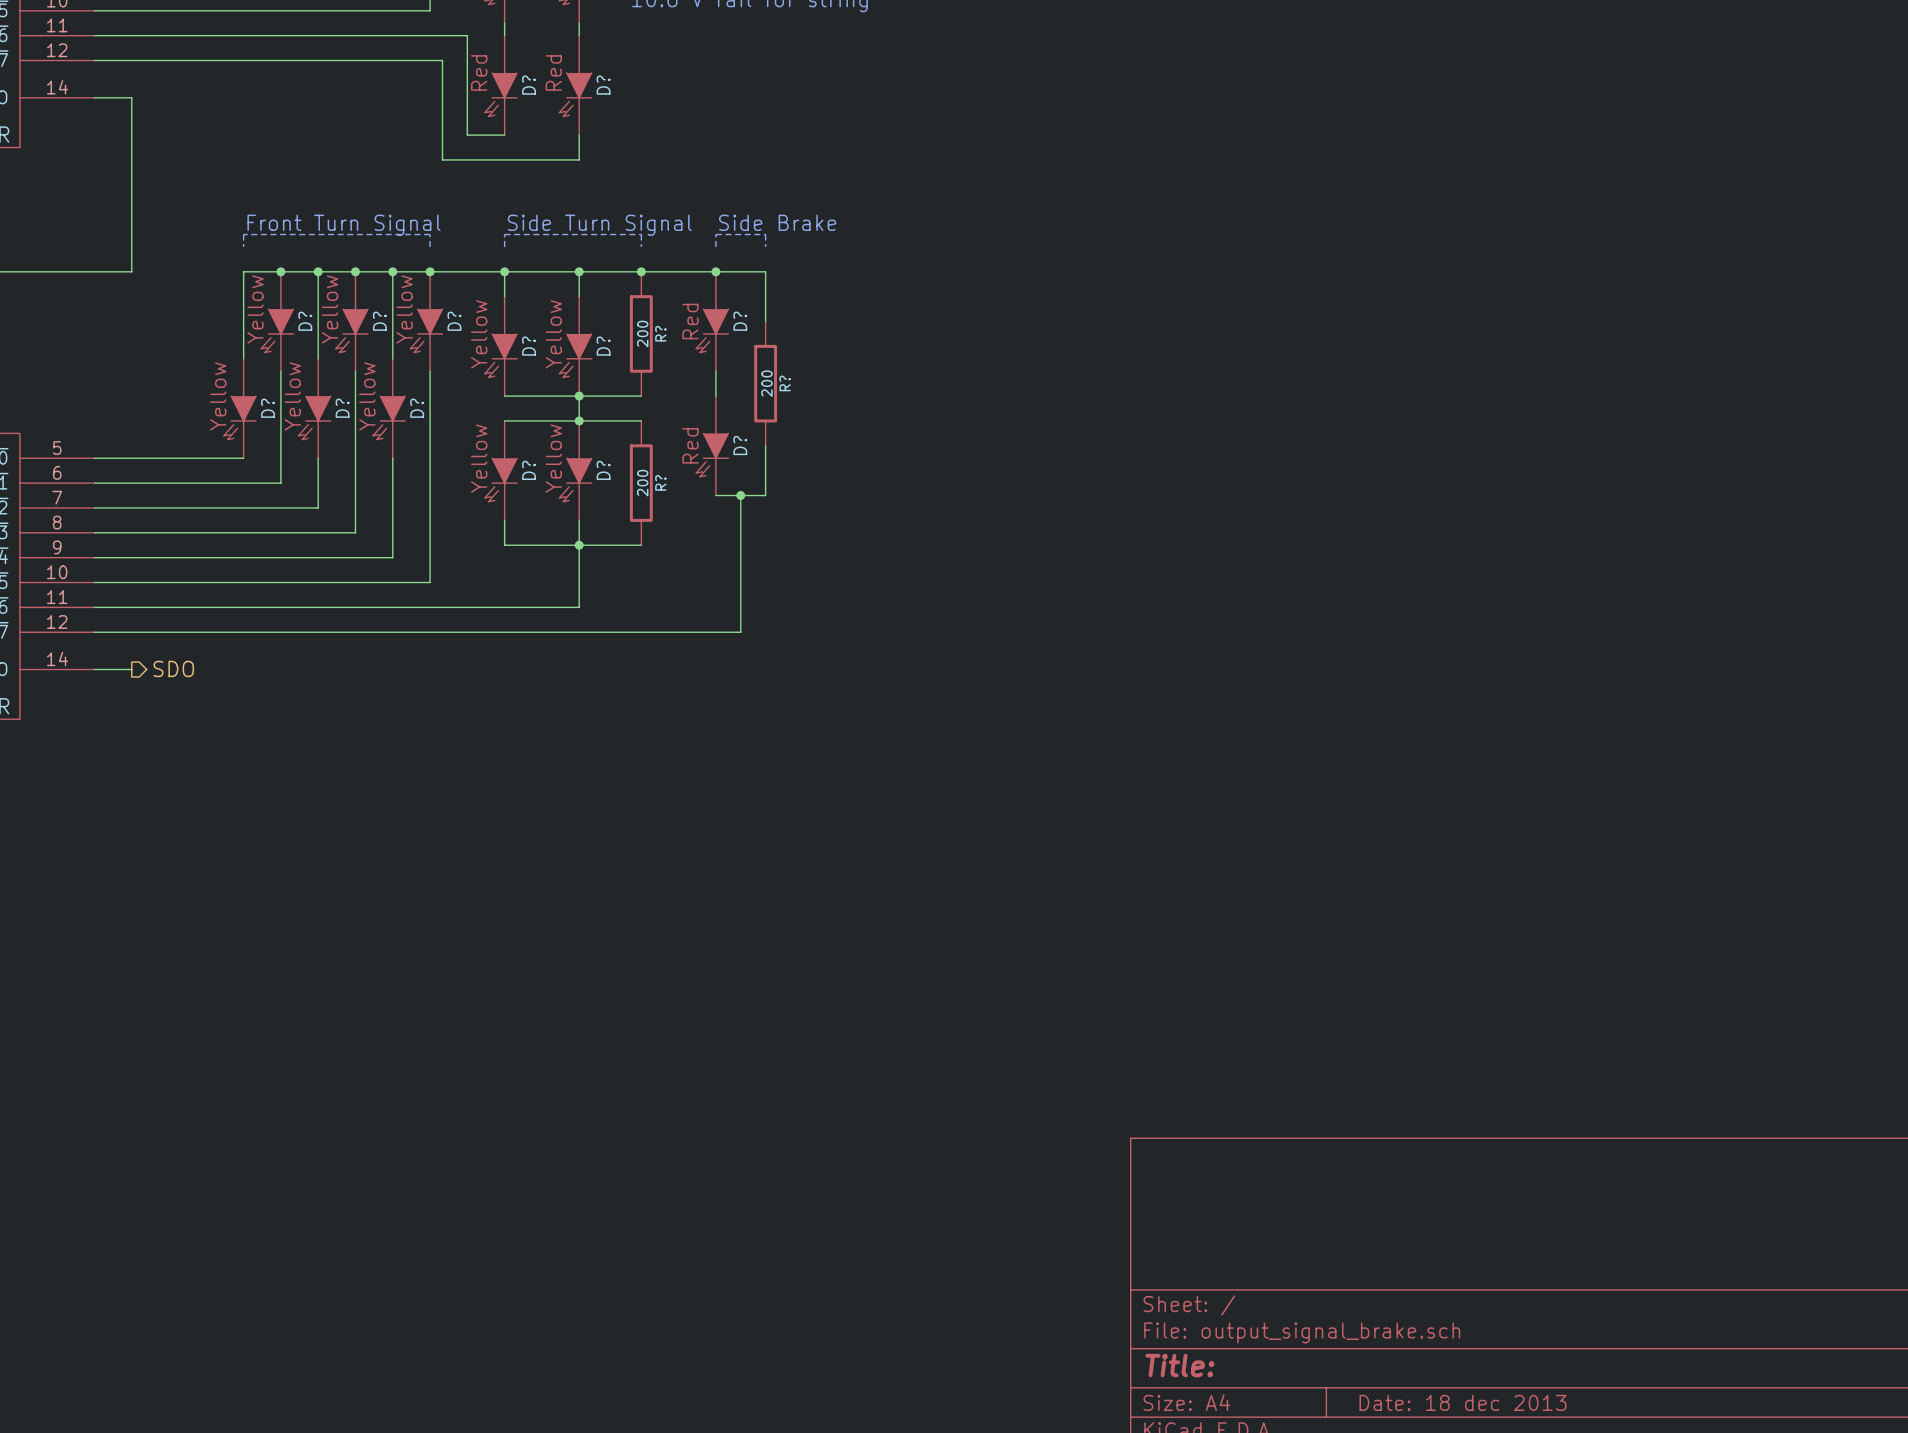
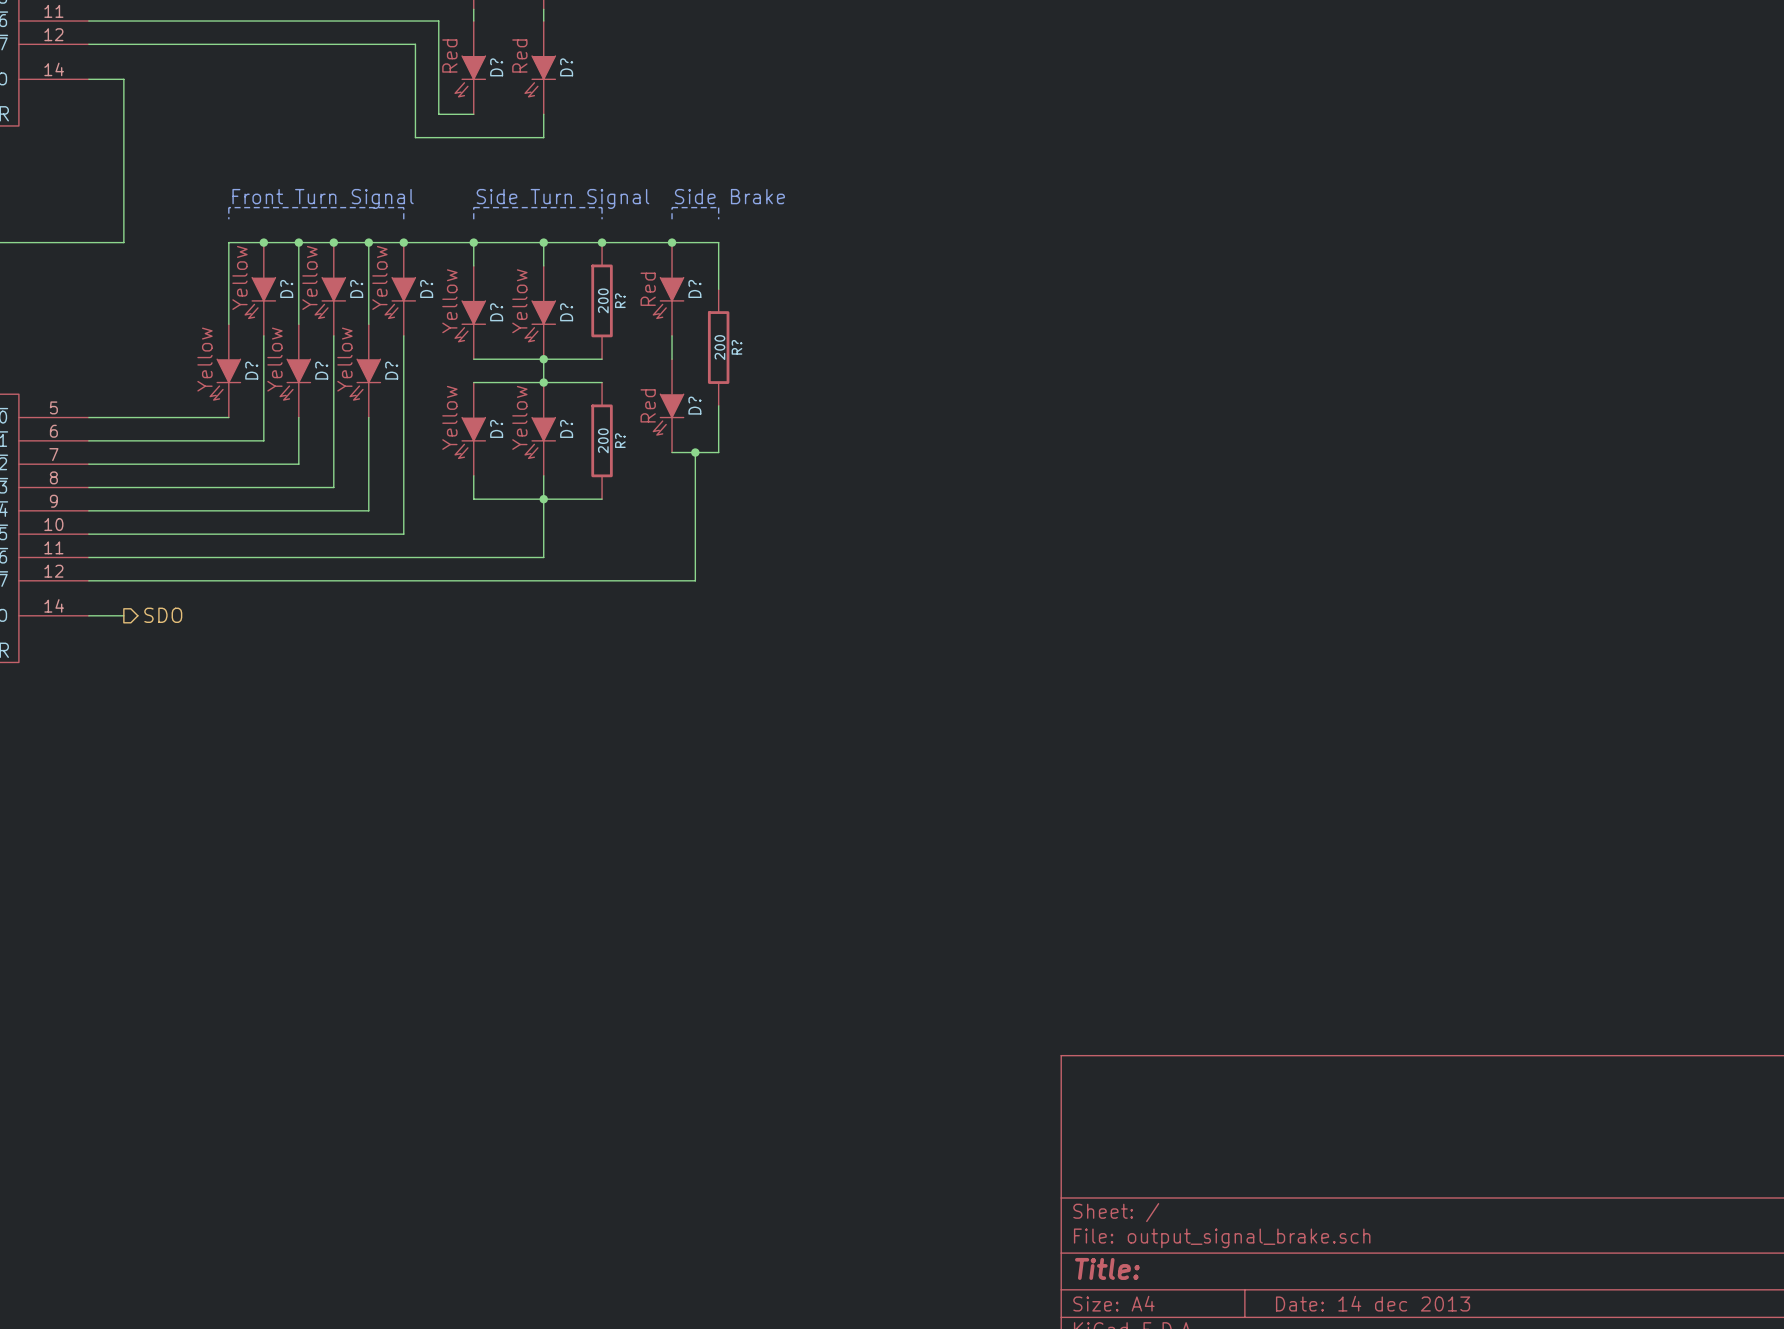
title block: Date: 18 dec 2013 (1462, 1402) -> Date: 14 dec 2013 (1373, 1303)

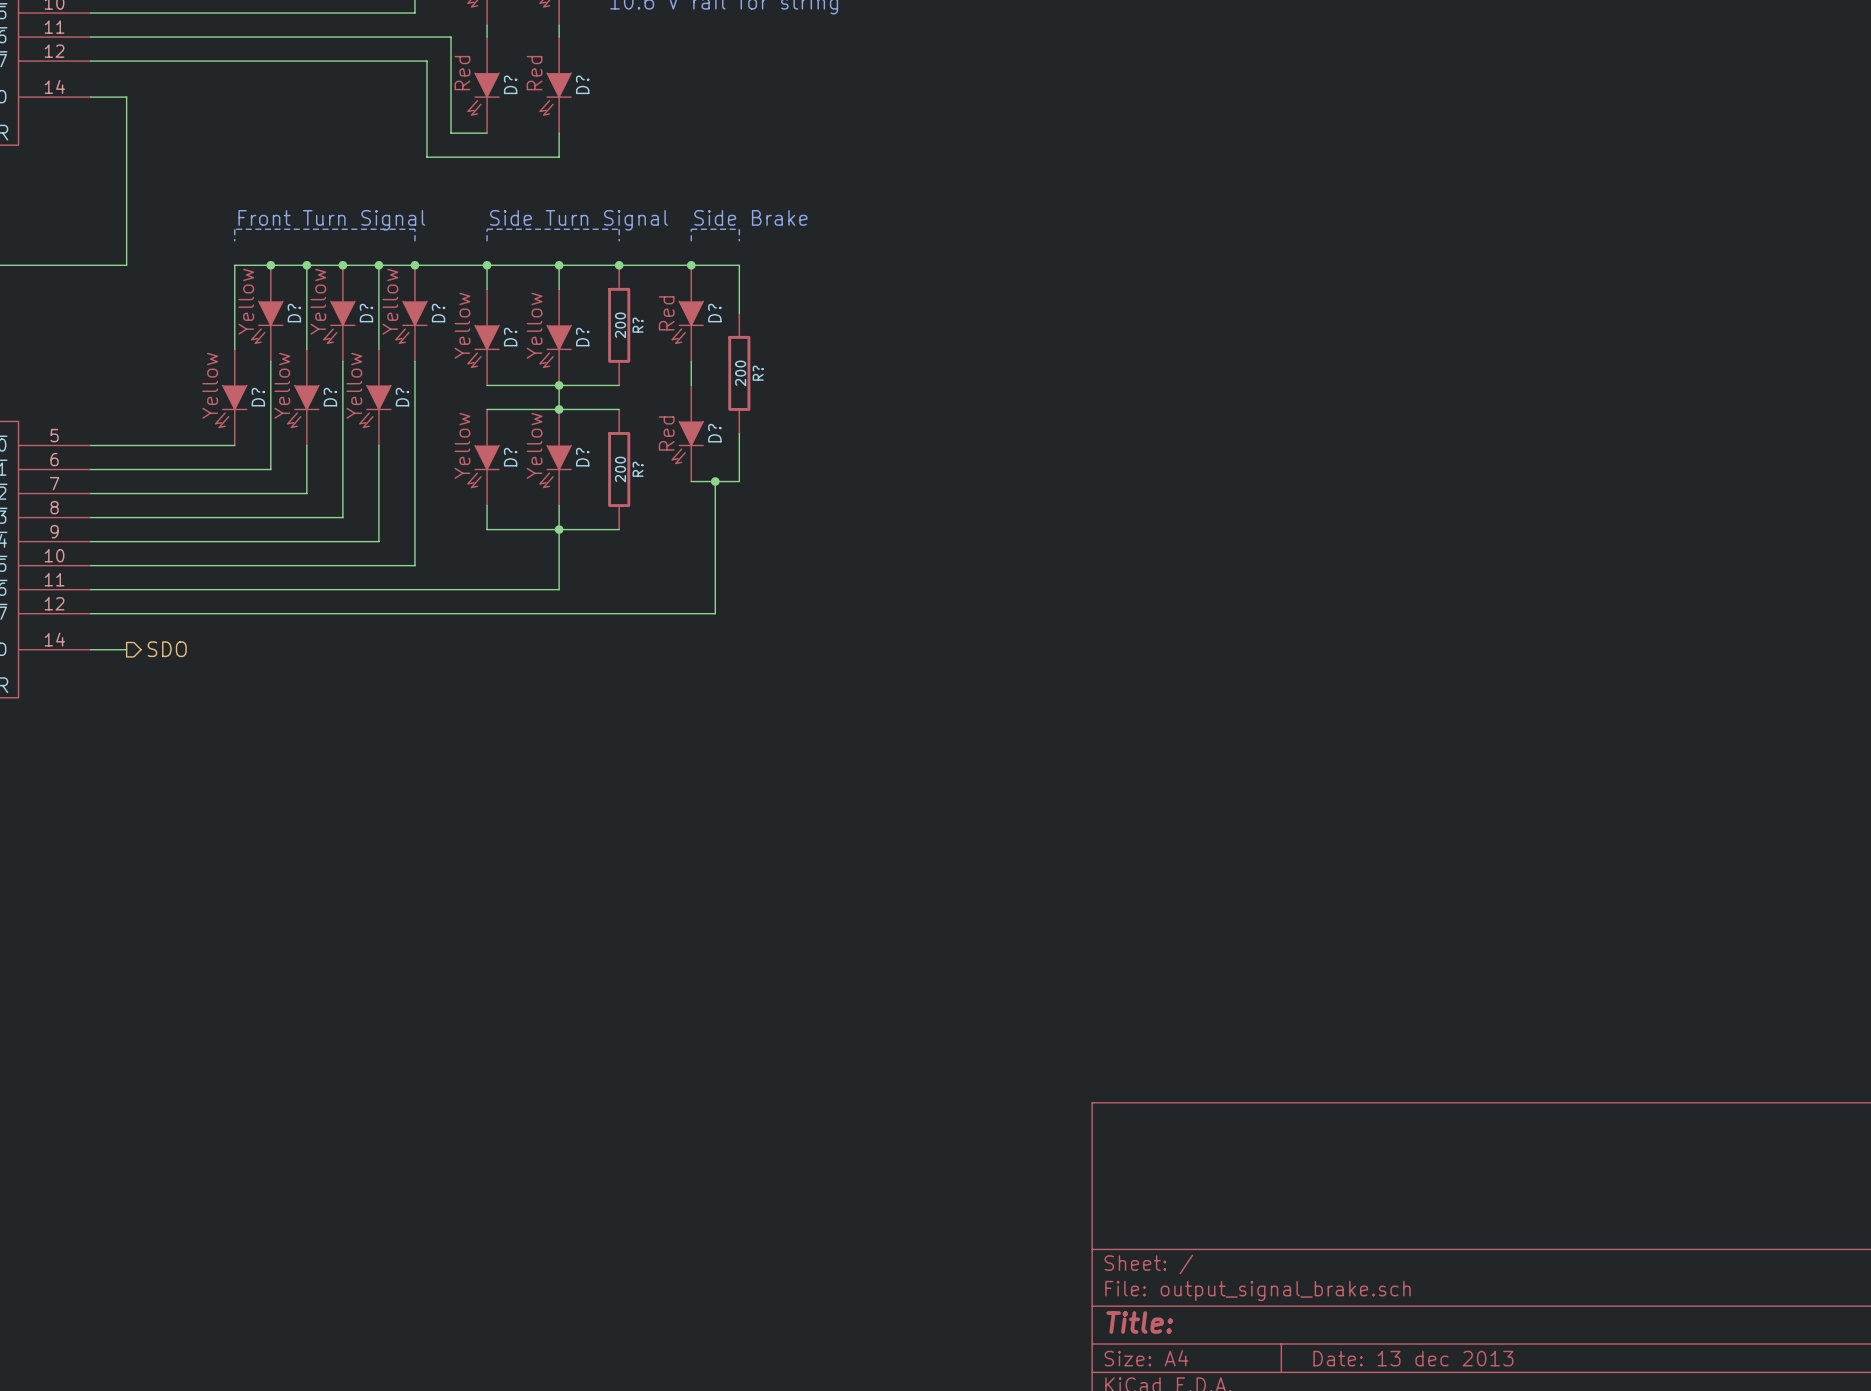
title block: Date: 14 dec 2013 (1373, 1303) -> Date: 13 dec 2013 (1413, 1358)

